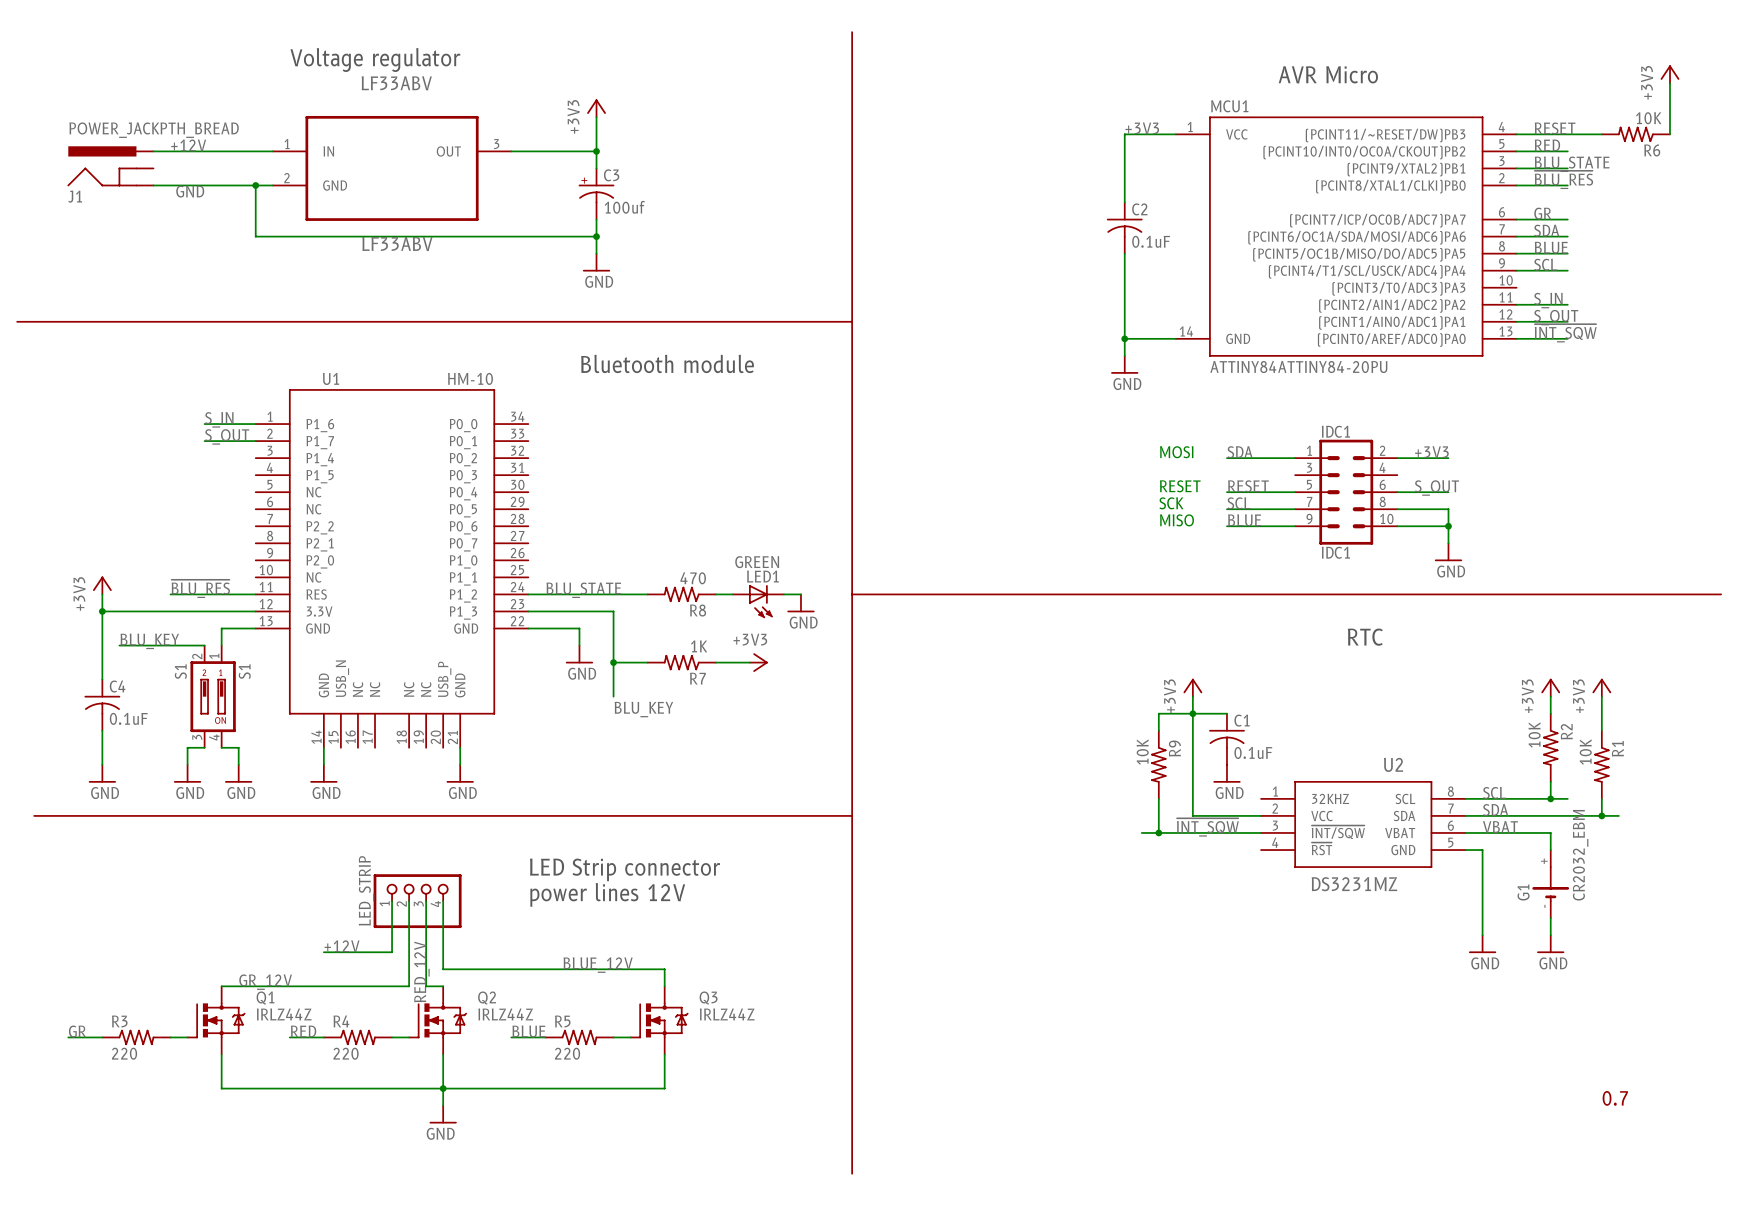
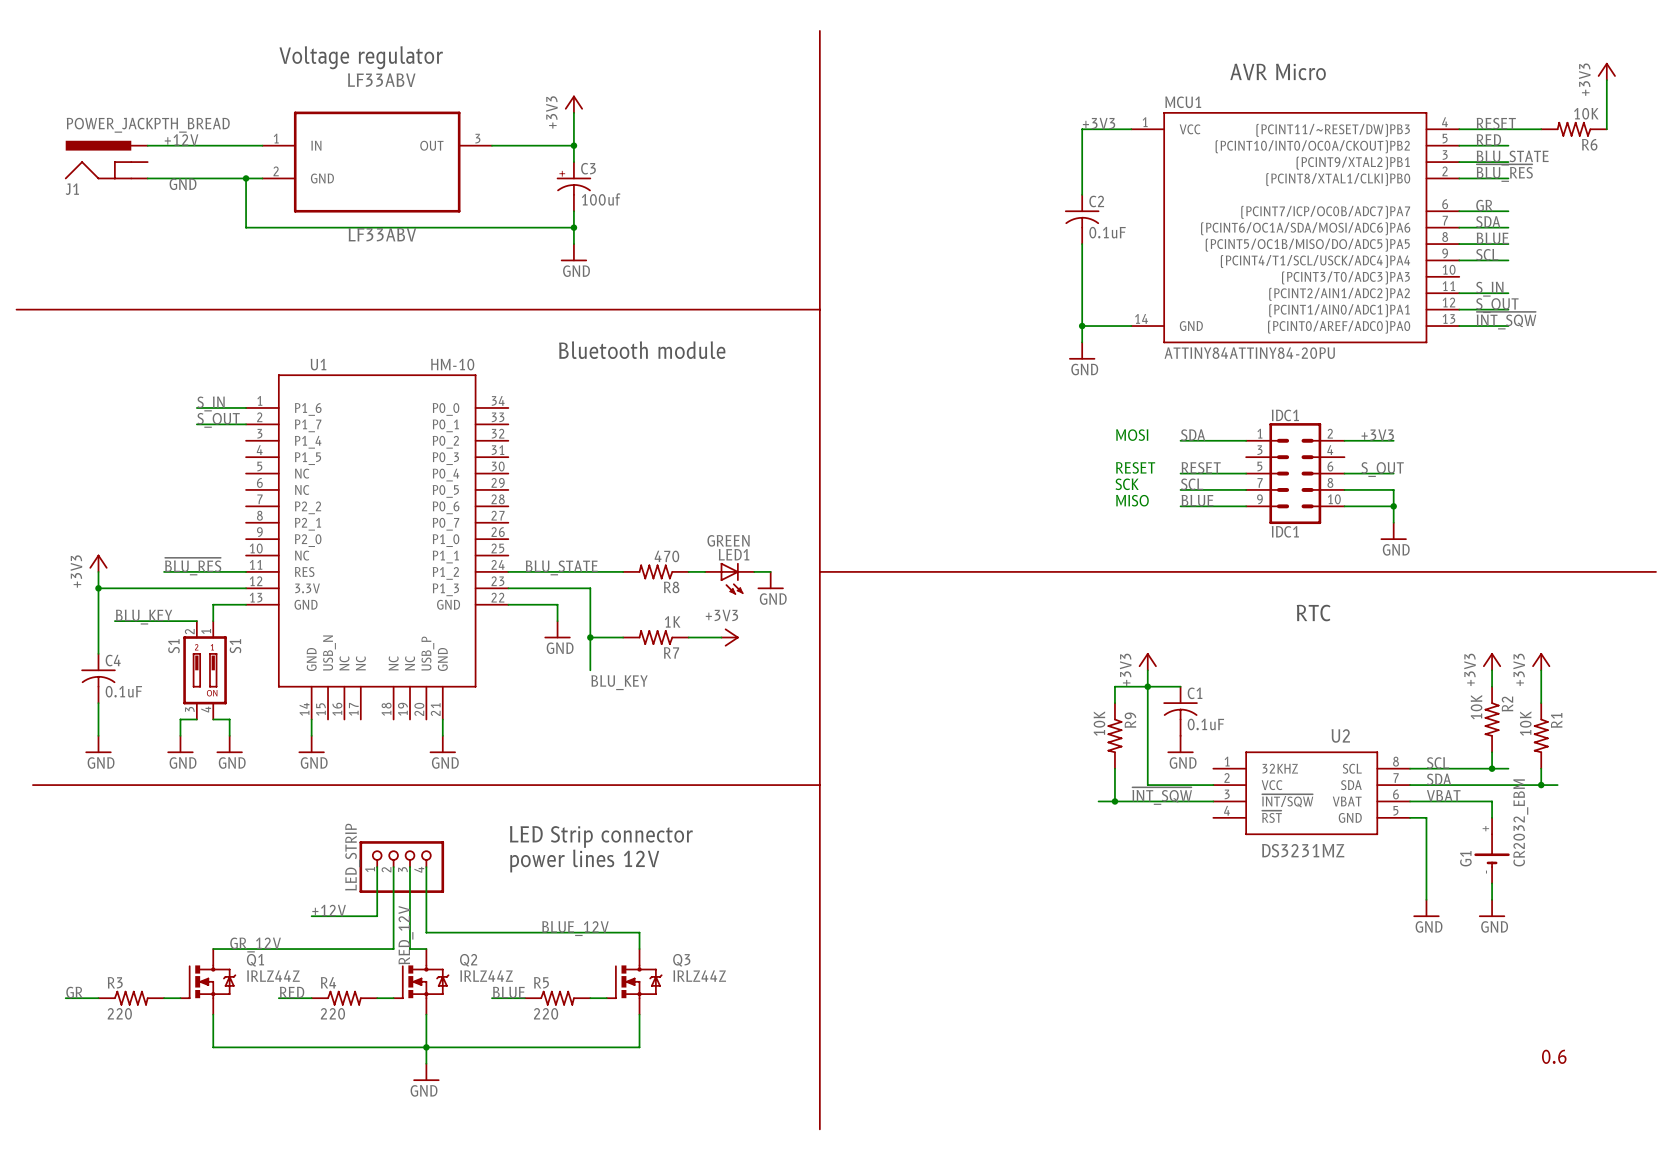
text: 0.7 (1615, 1098) -> 0.6 (1554, 1056)

